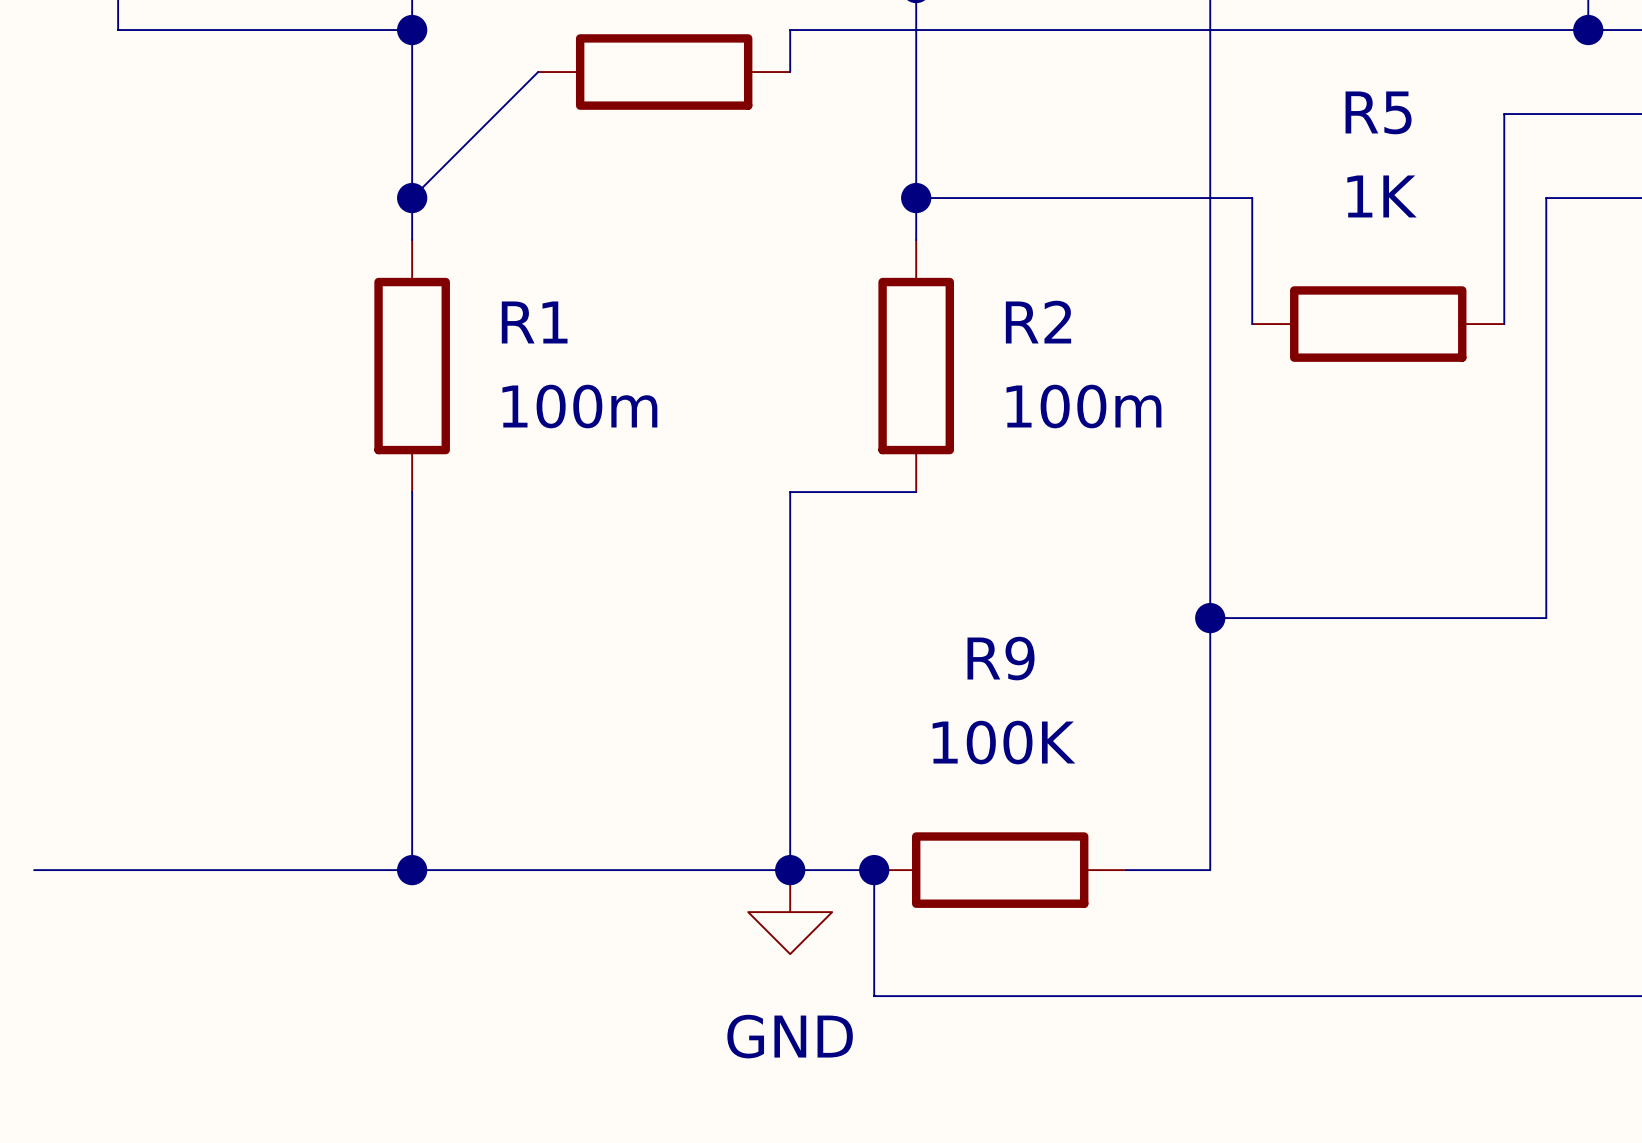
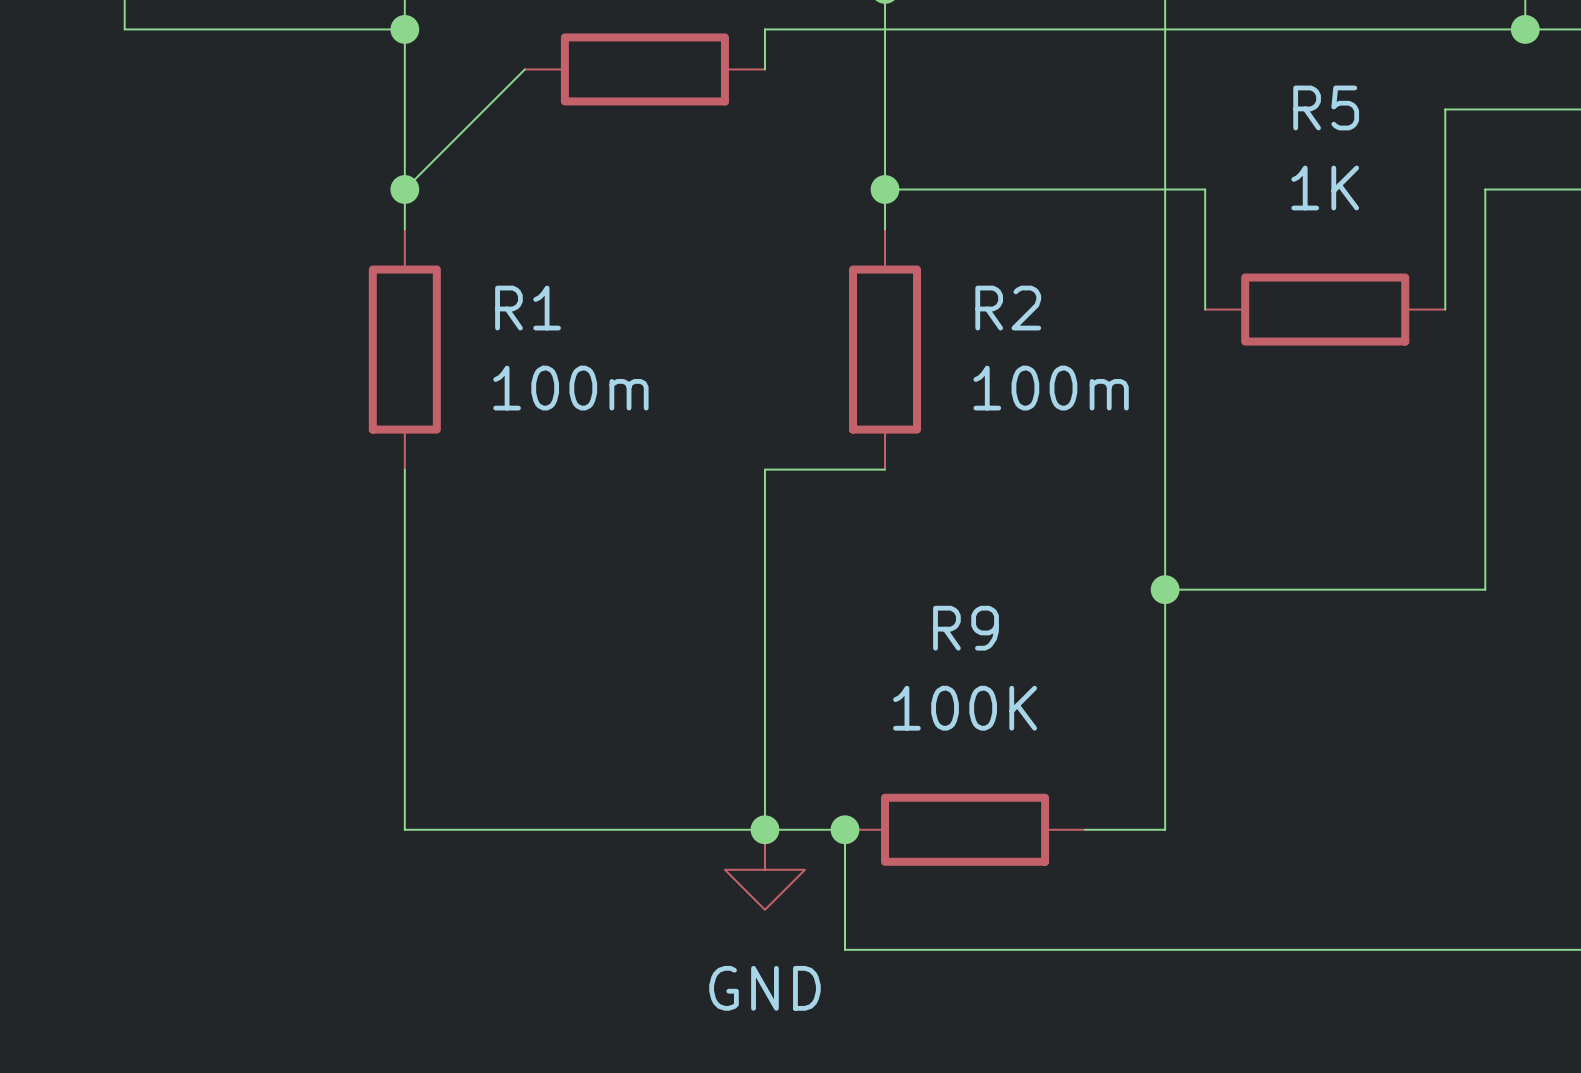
wire: (34, 870) (412, 870) -> none
junction: (412, 870) -> none

